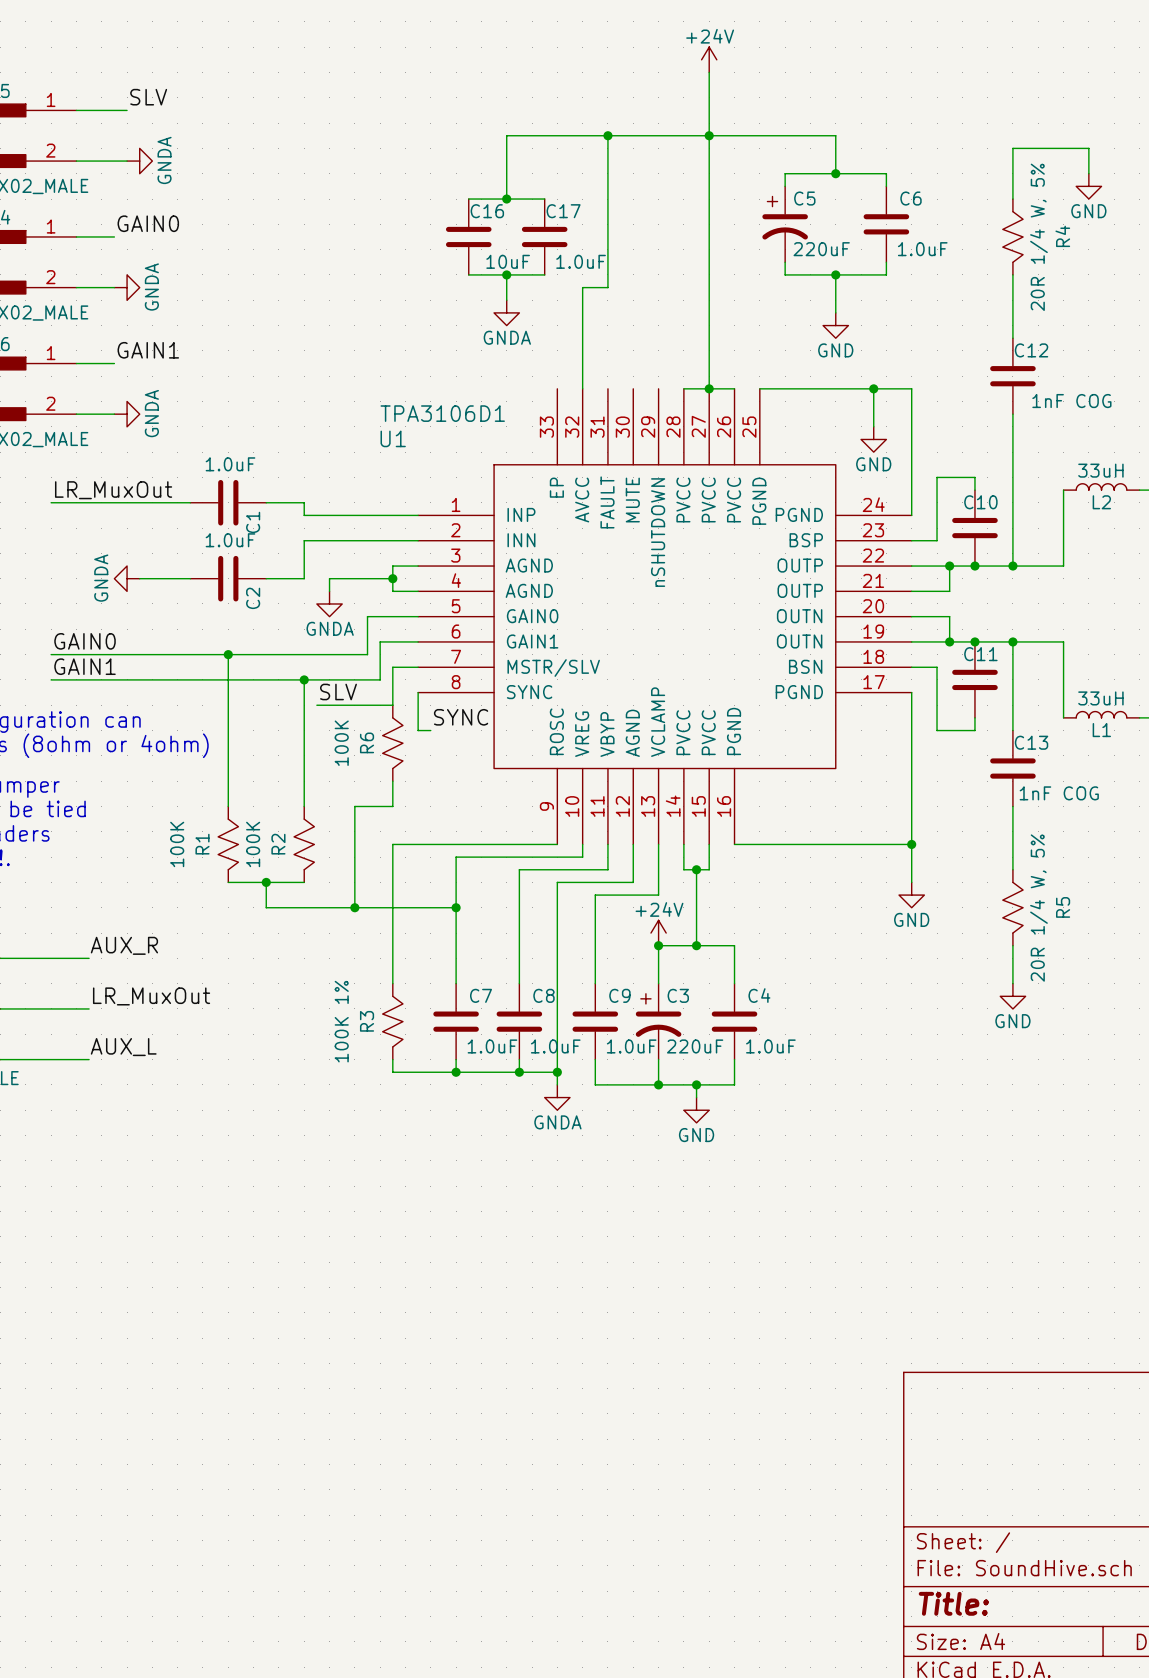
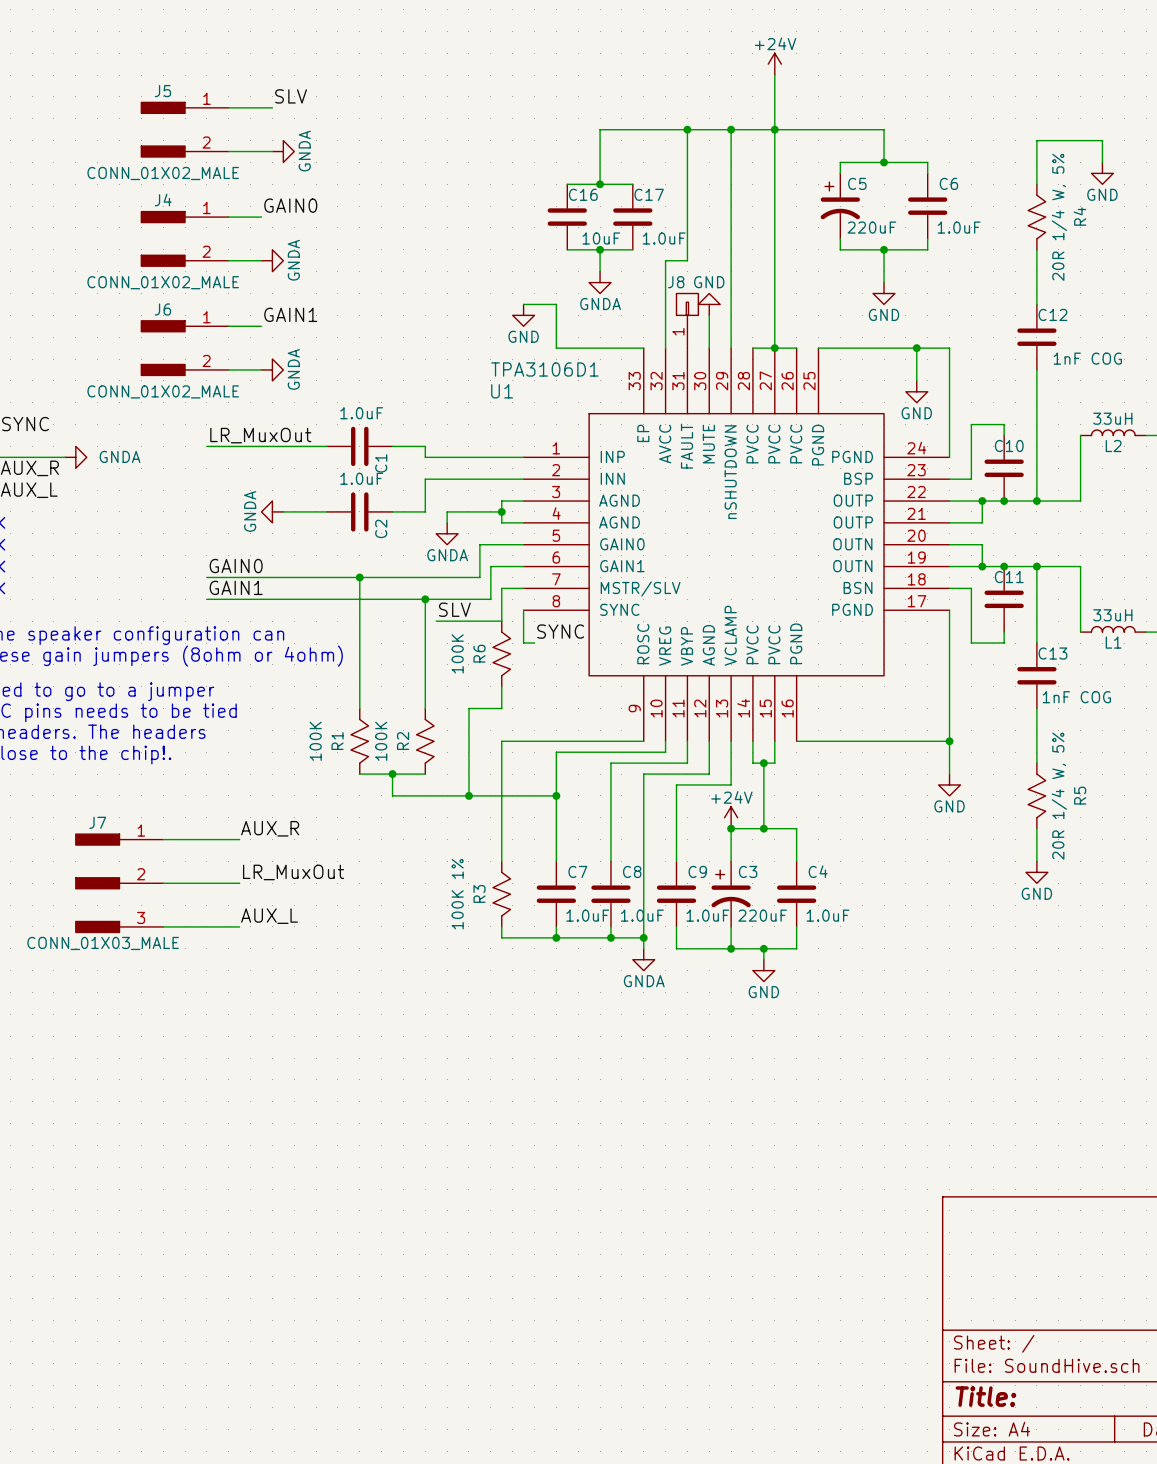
wire: none -> (731, 129) (731, 348)
junction: none -> (731, 129)
wire: none -> (523, 304) (556, 304) (556, 348) (643, 348)
power symbol: none -> GND (709, 304)
power symbol: none -> GND (523, 315)
wire: none -> (709, 315) (709, 348)
J8: none -> (687, 320)

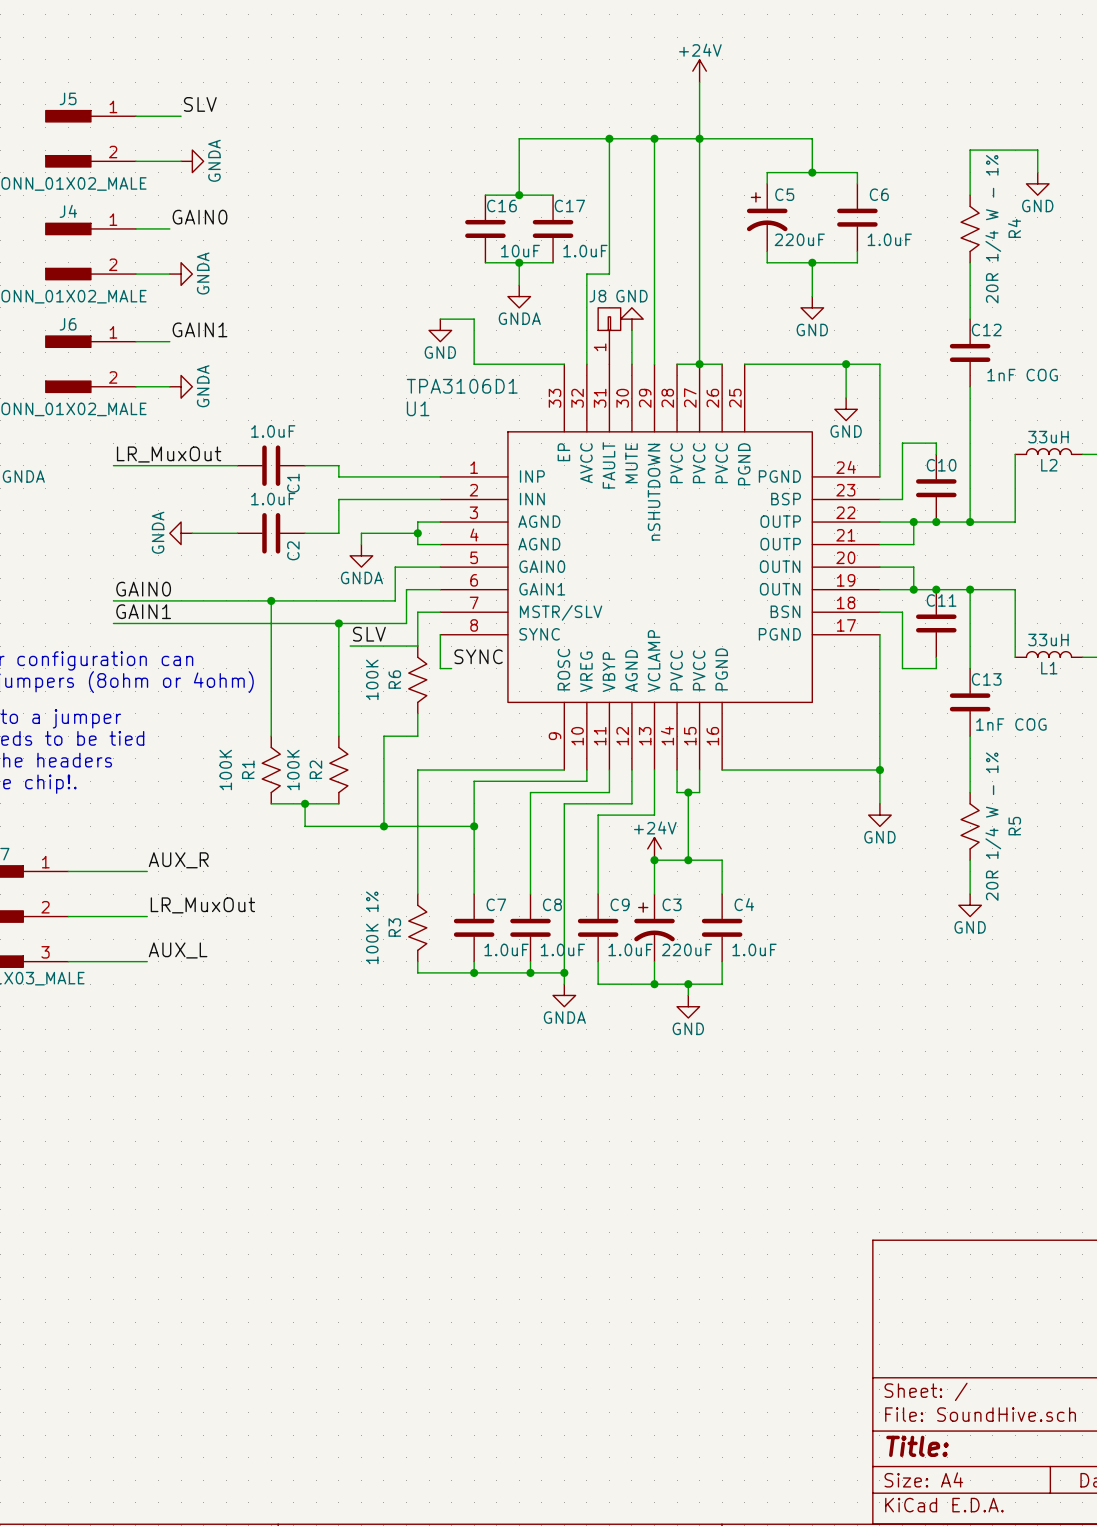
R4 value: 20R 1/4 W, 5% (1059, 217) -> 20R 1/4 W - 1% (993, 229)
R5 value: 20R 1/4 W, 5% (1059, 796) -> 20R 1/4 W - 1% (993, 826)

